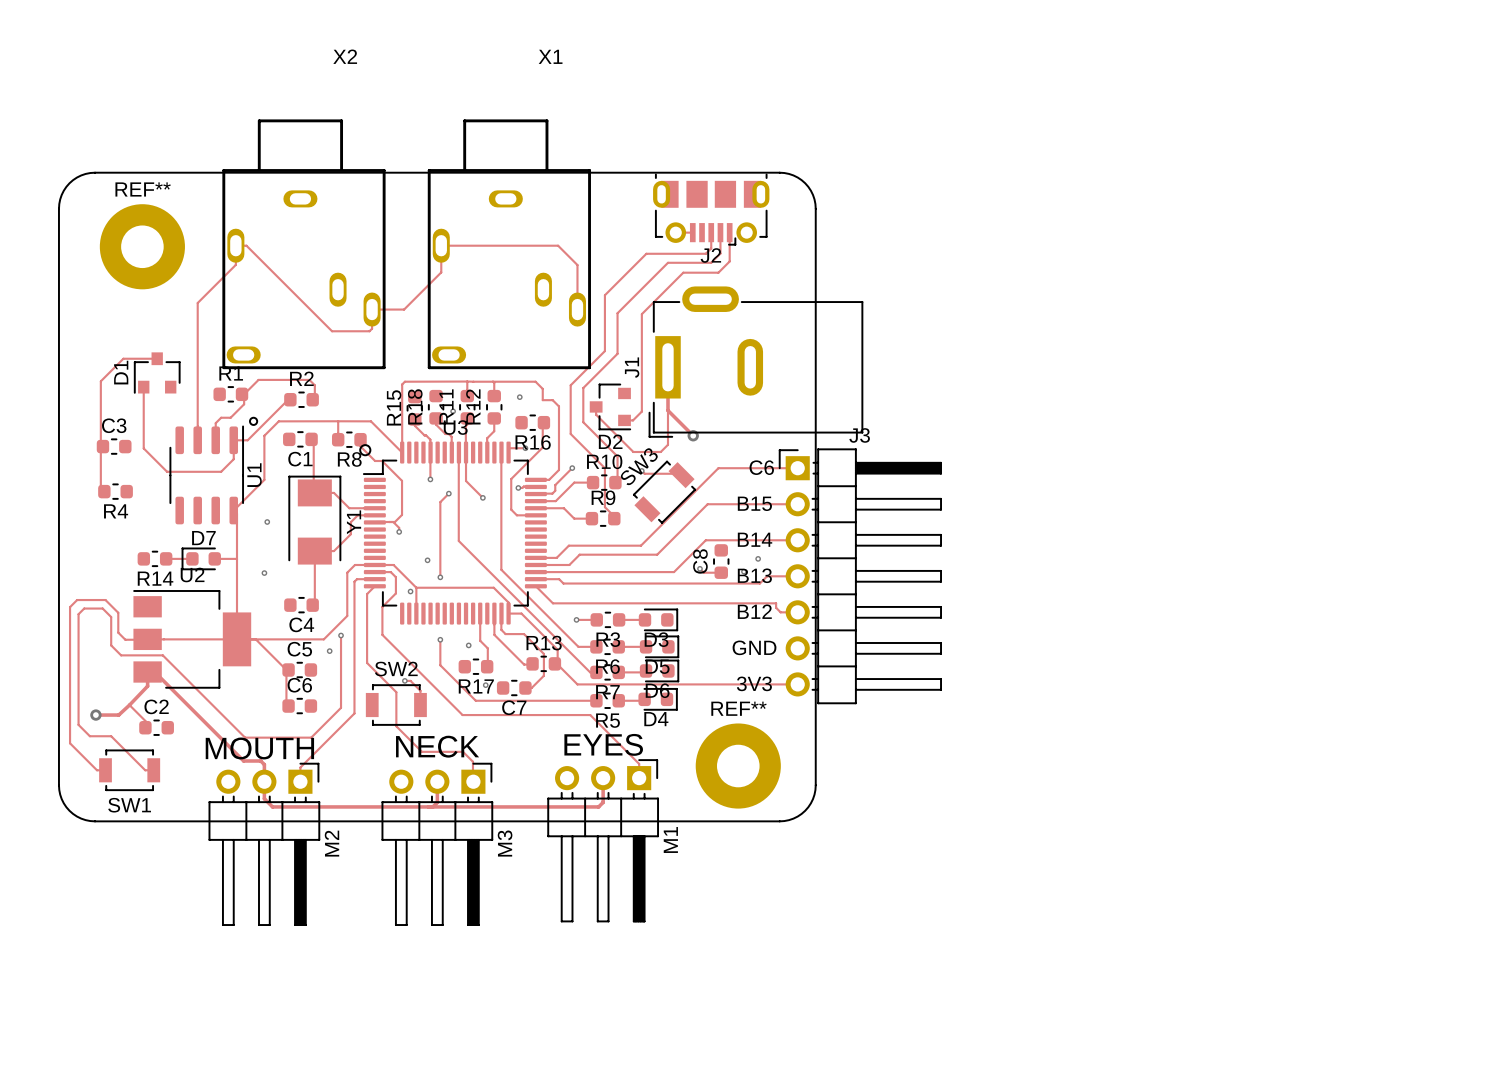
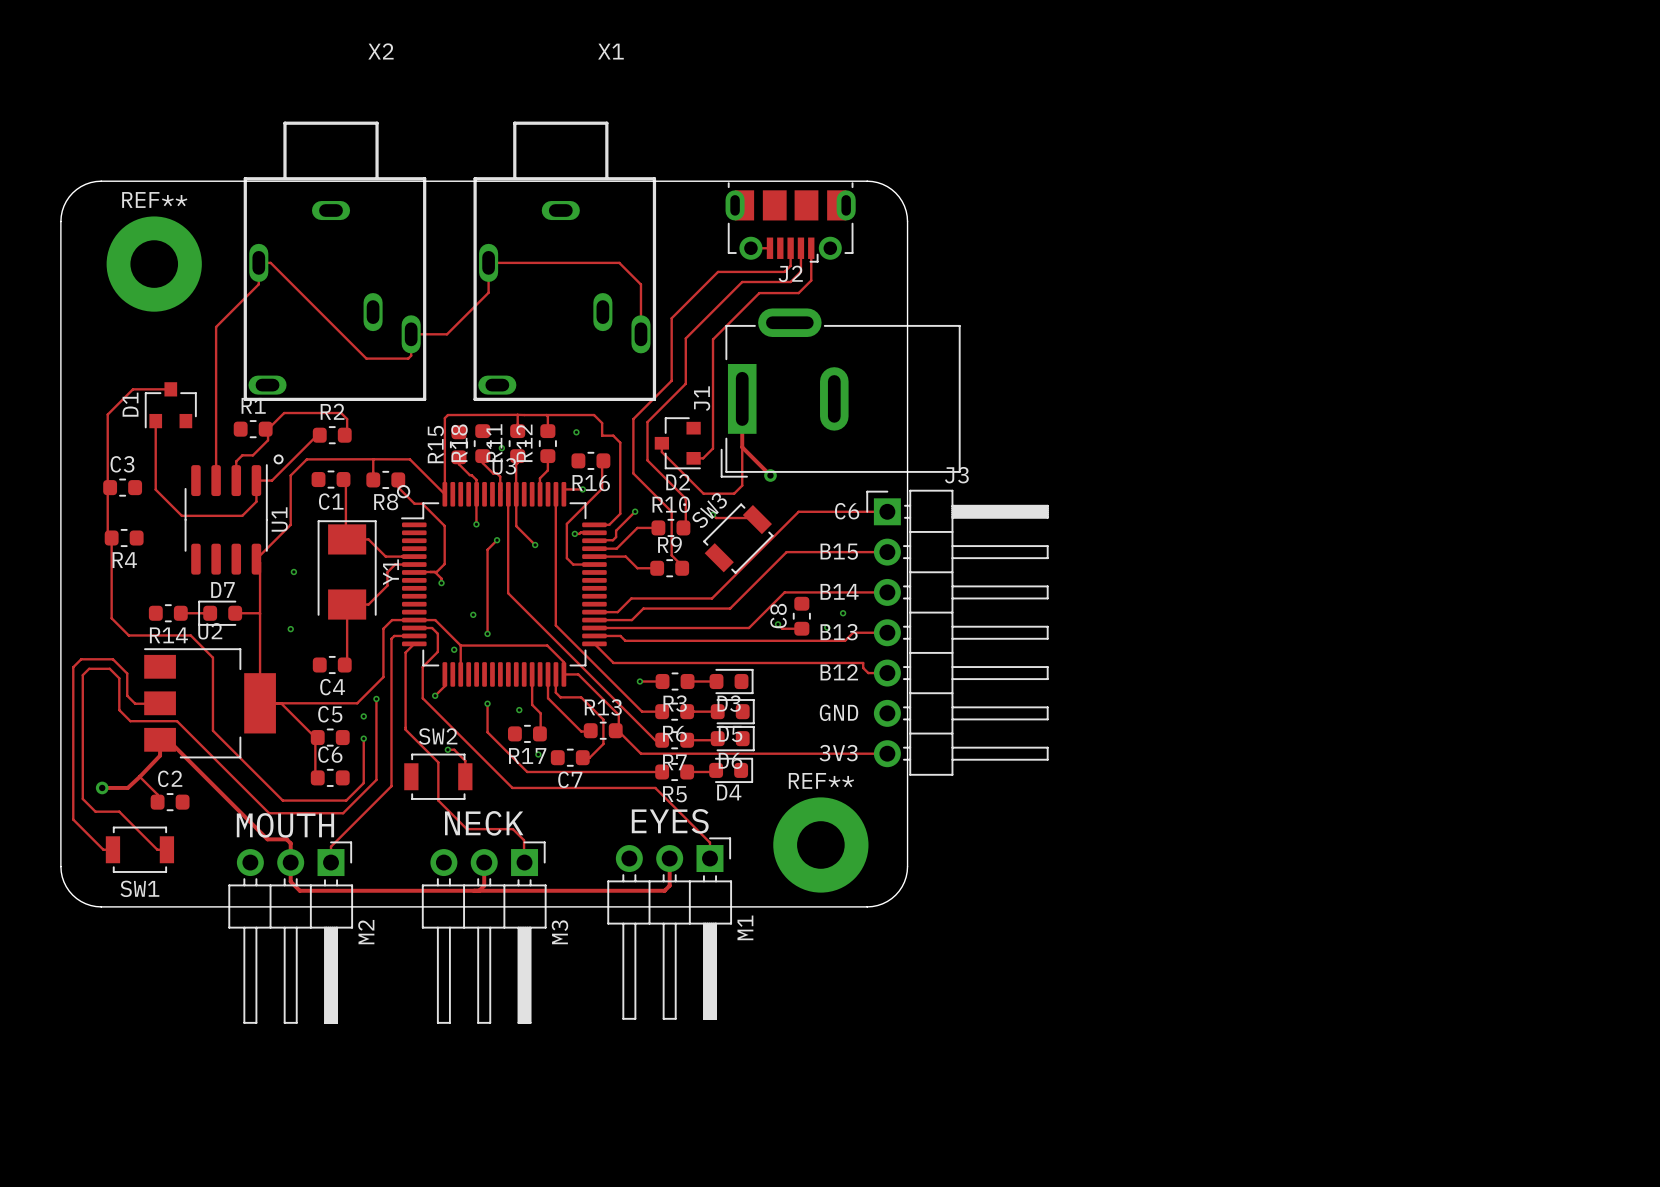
track: none -> (111, 538) (111, 618) (128, 635) (190, 635) (212, 657) (212, 730) (282, 800) (346, 800) (363, 783) (363, 738)
track: none -> (444, 675) (444, 686) (435, 695)
via: none -> (435, 695)
track: (147, 639) (237, 639) -> none
via: none -> (363, 738)

